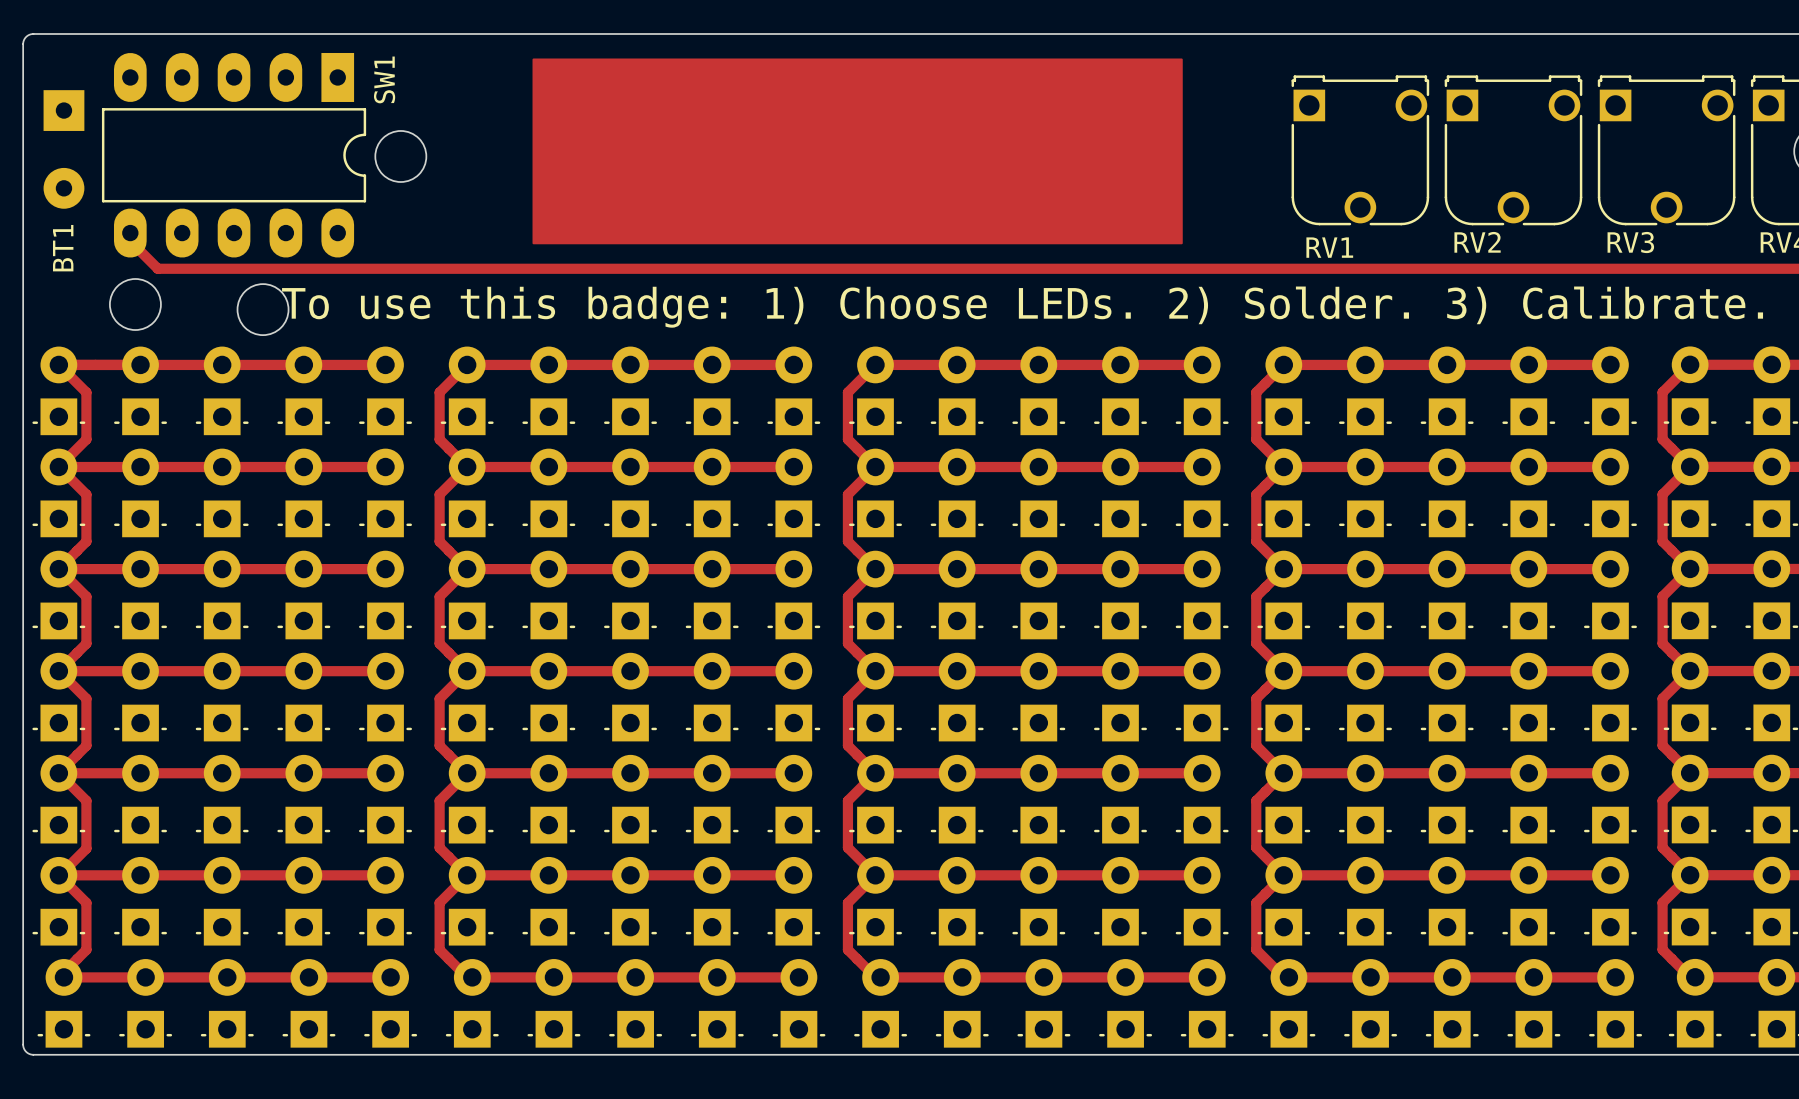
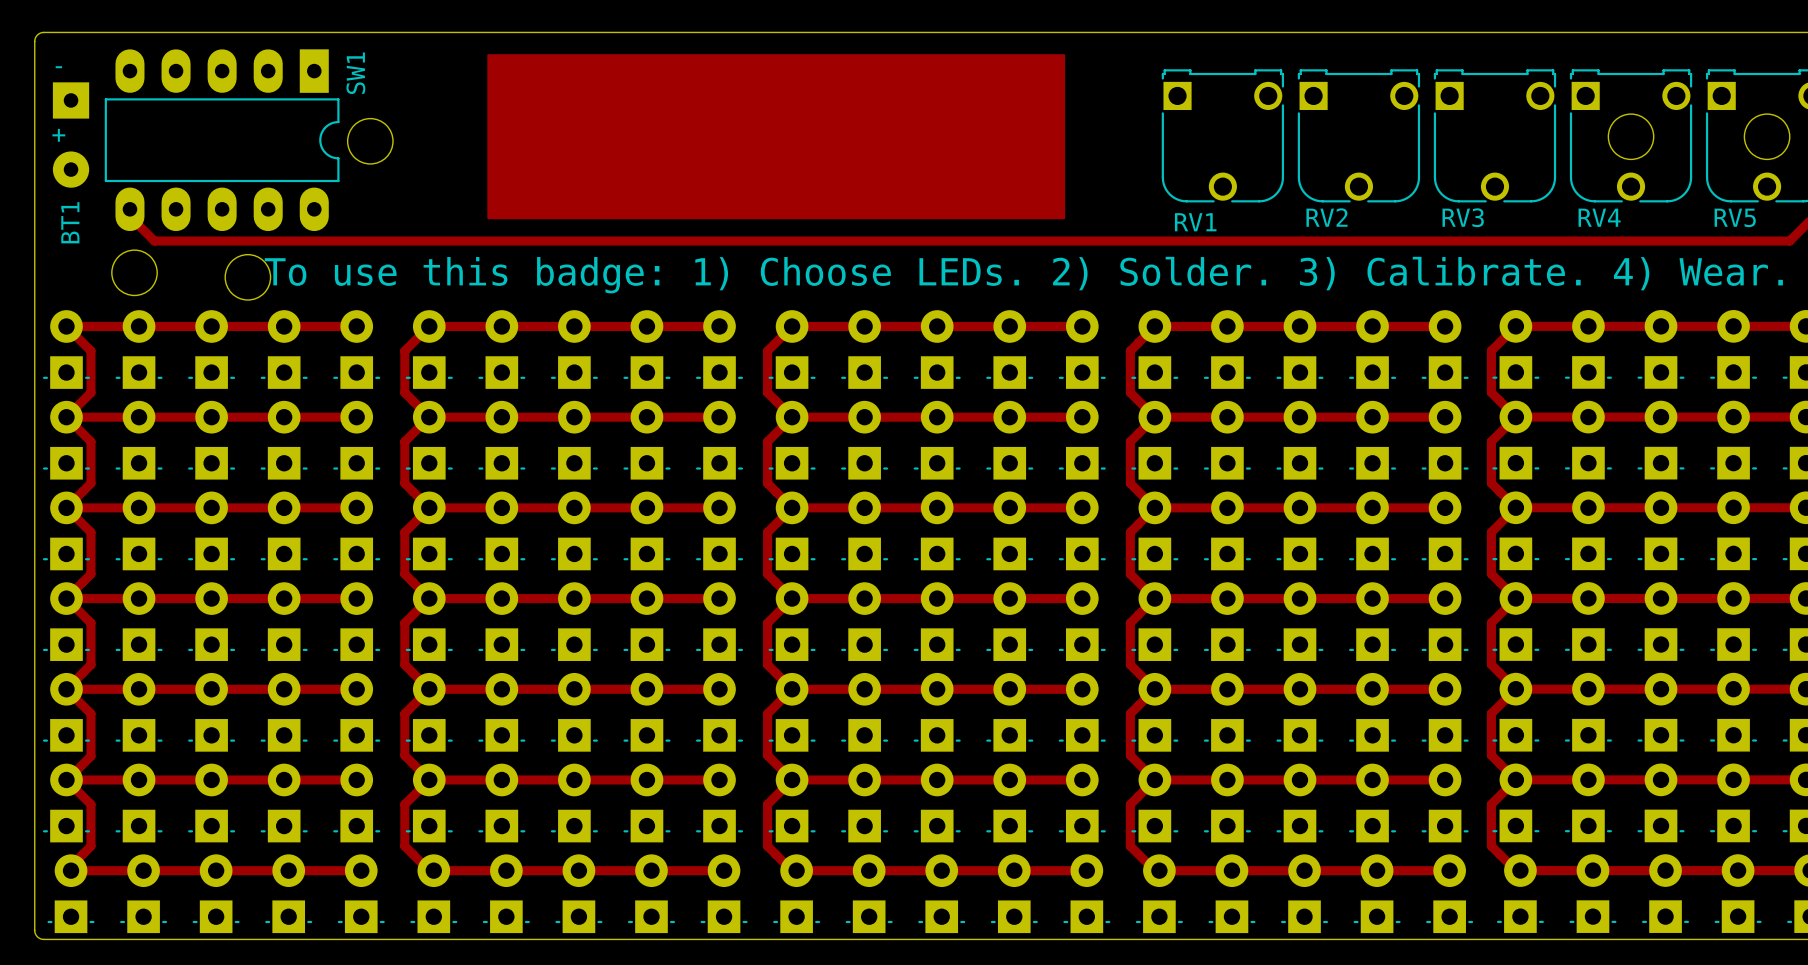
text: none -> - (58, 67)
text: none -> + (58, 135)

